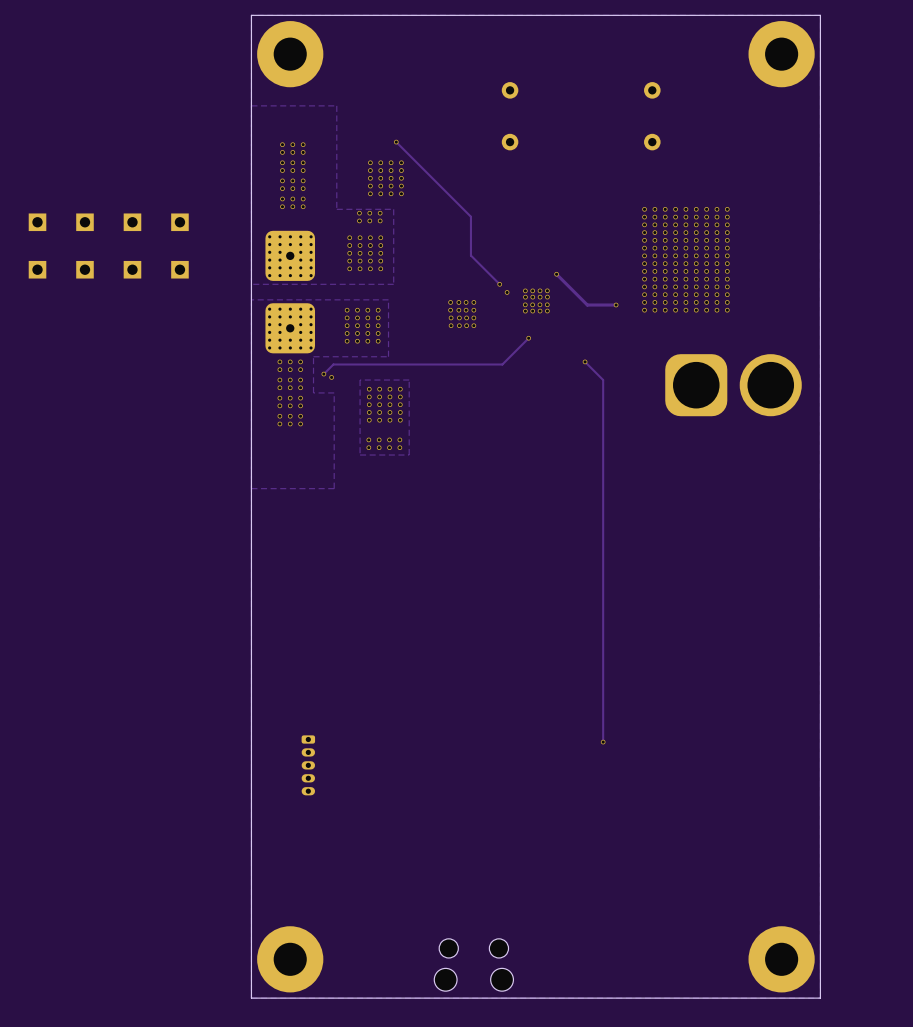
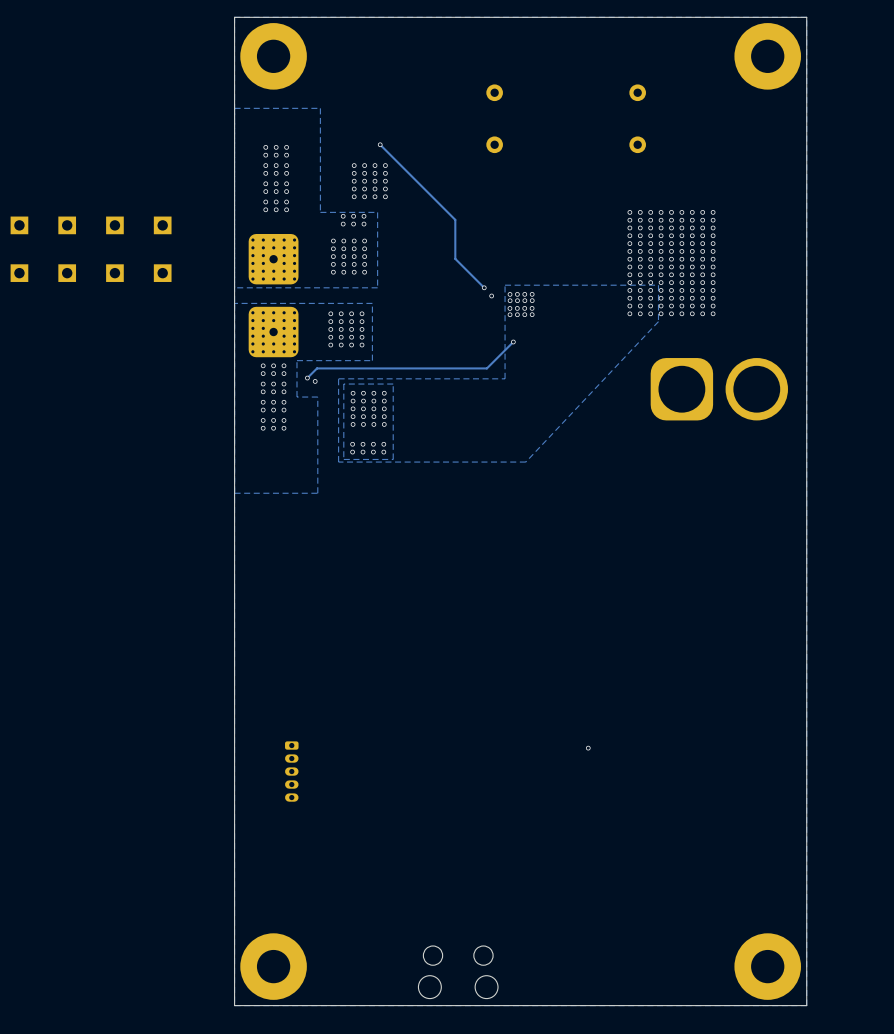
track: (556, 274) (587, 305) (616, 305) -> none
via: (556, 274) -> none
zone outline: none -> (658, 285) (658, 321) (525, 462) (338, 462) (338, 378) (505, 378) (505, 285) (658, 285)
via: (450, 302) -> none
via: (458, 302) -> none
via: (466, 302) -> none
via: (473, 302) -> none
via: (616, 305) -> none
via: (450, 310) -> none
via: (458, 310) -> none
via: (466, 310) -> none
via: (473, 310) -> none
via: (451, 317) -> none
via: (459, 317) -> none
via: (466, 317) -> none
via: (473, 317) -> none
via: (451, 325) -> none
via: (459, 325) -> none
via: (466, 325) -> none
via: (473, 325) -> none
track: (585, 361) (603, 380) (603, 742) -> none
via: (585, 361) -> none

